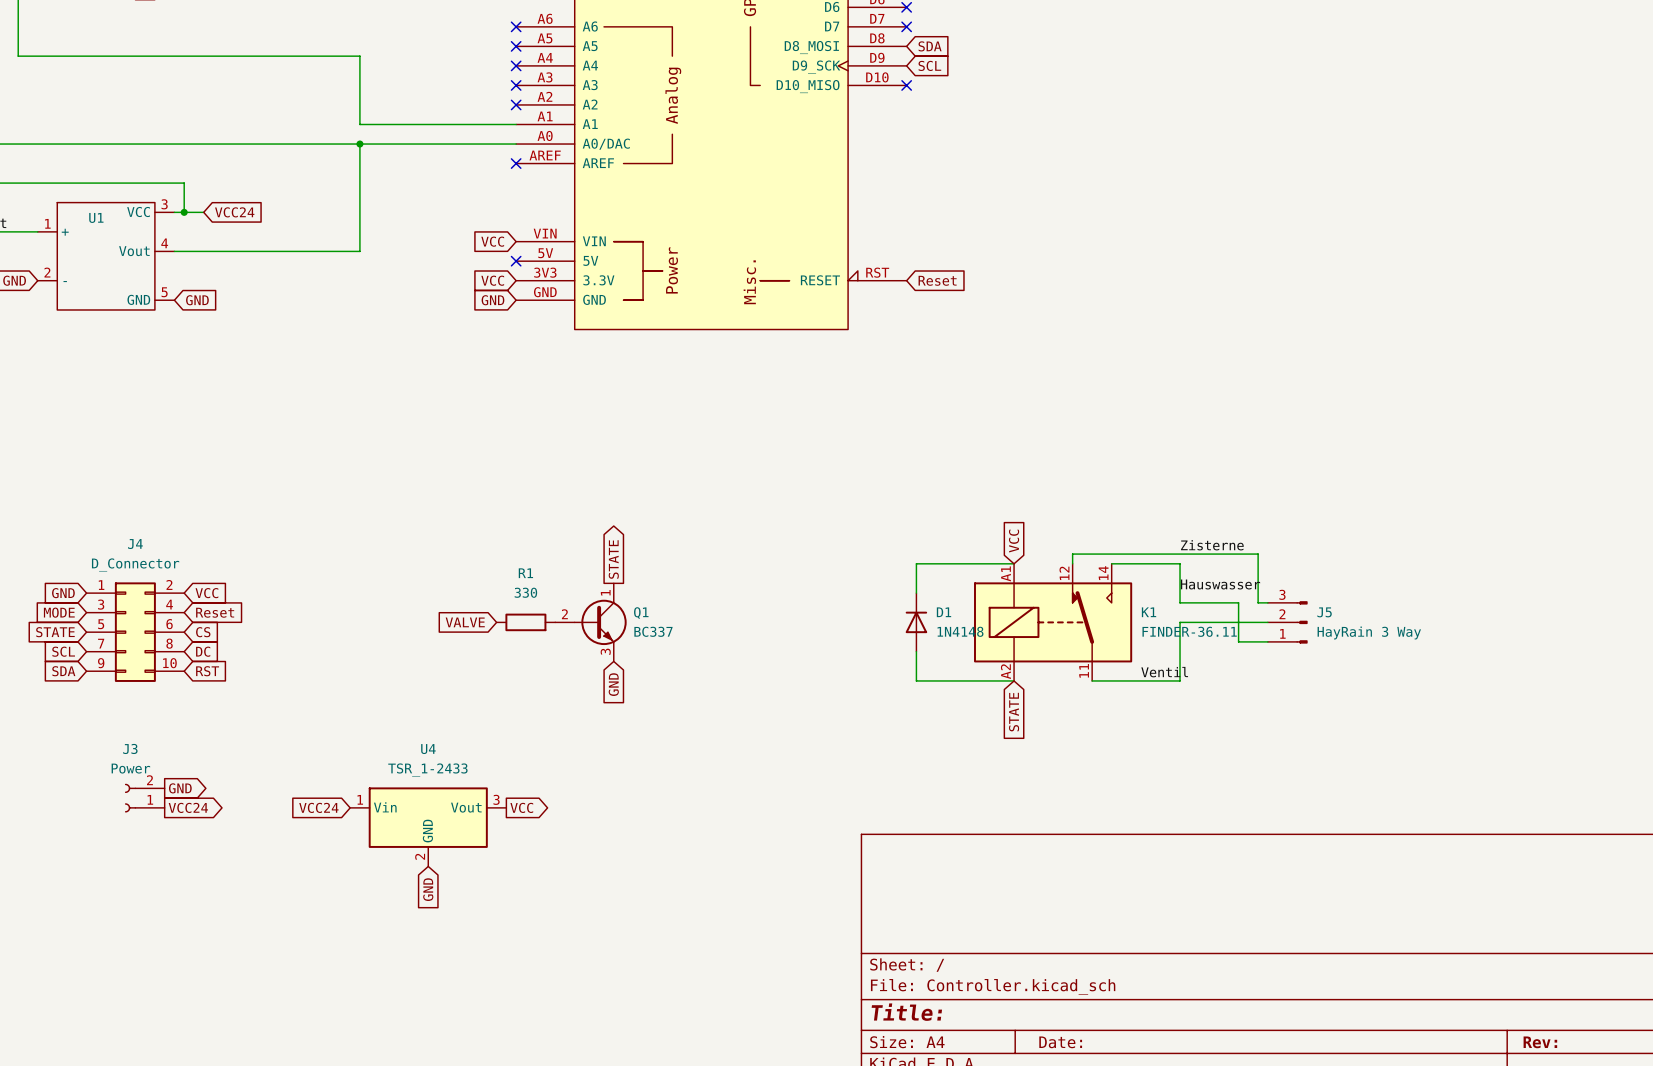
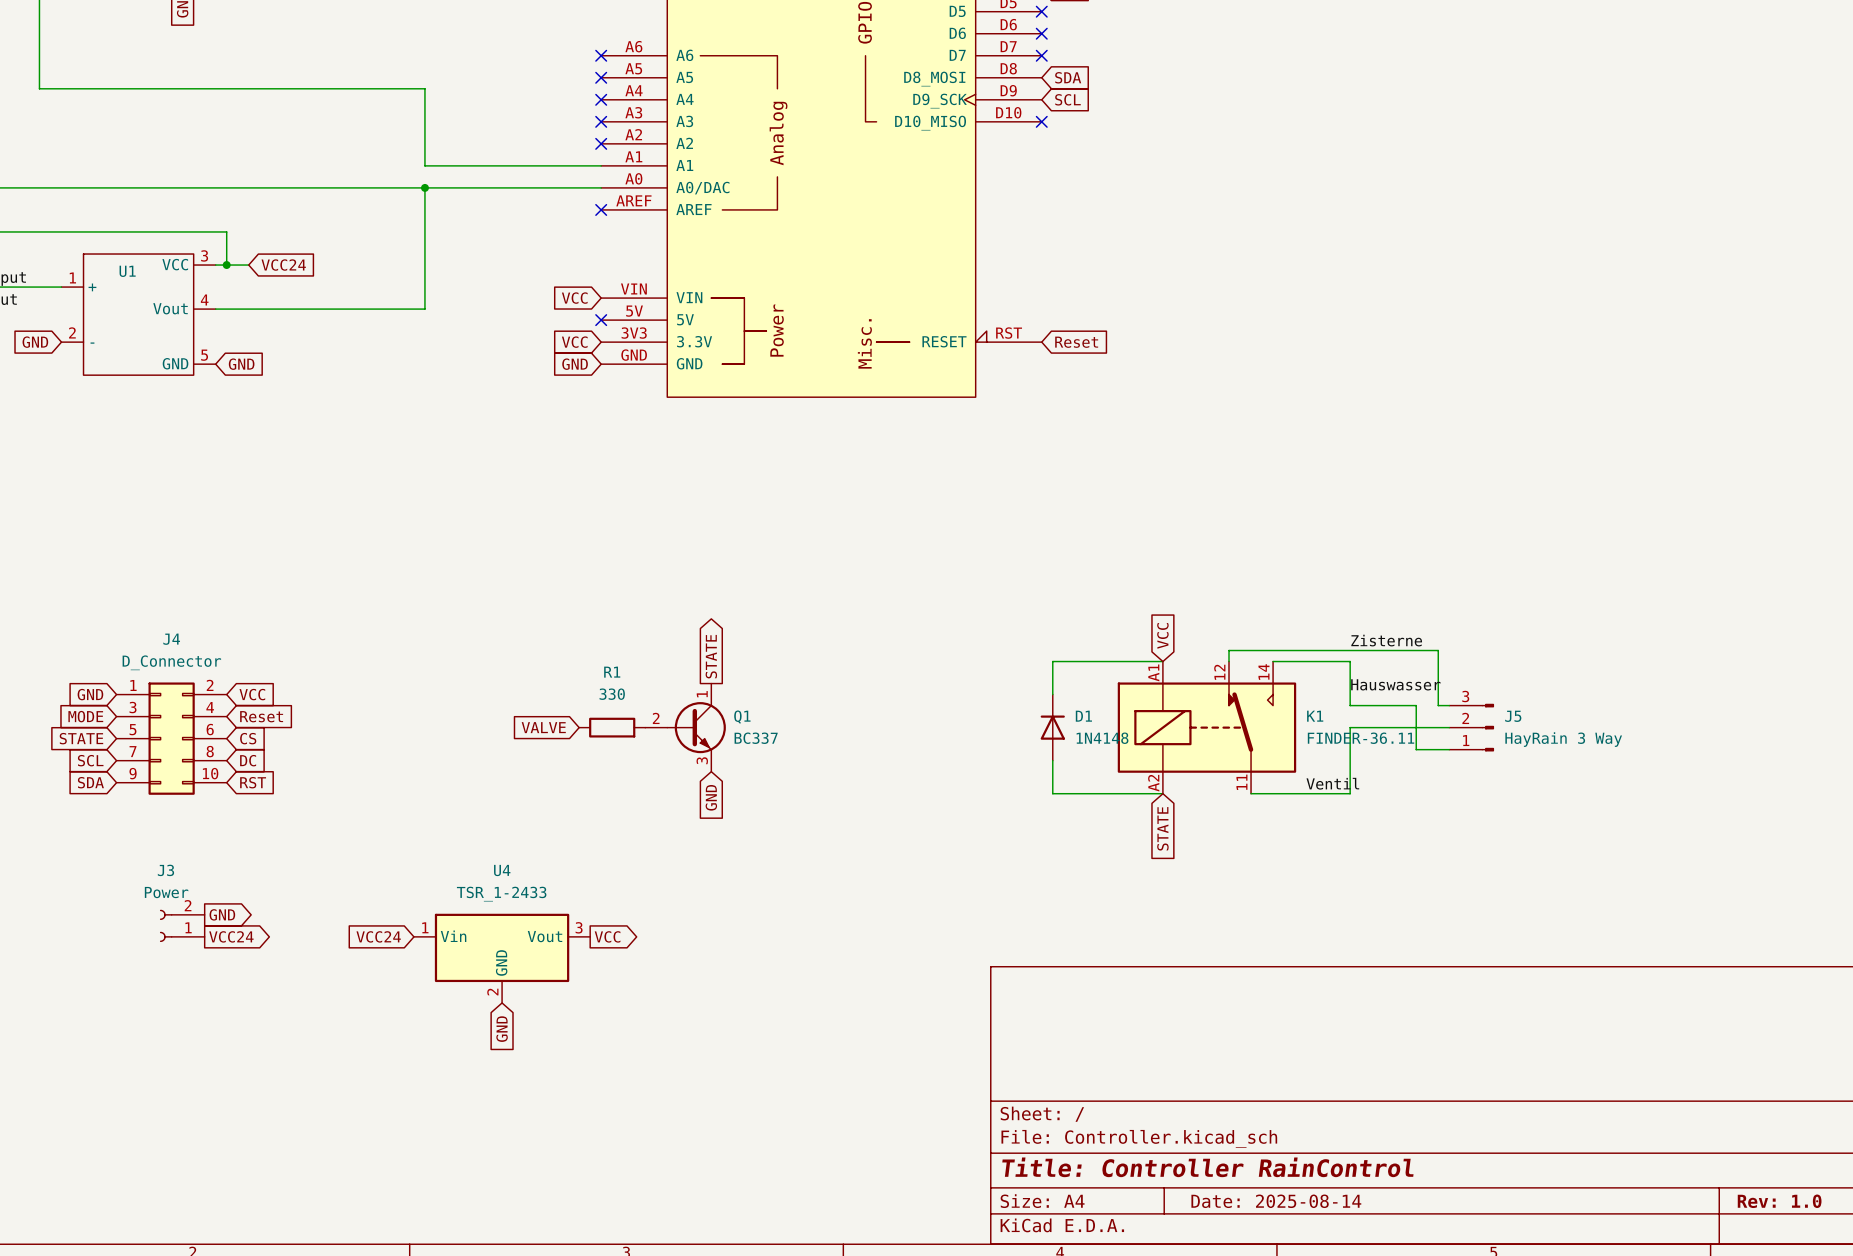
title block: Title: (906, 1012) -> Title: Controller RainControl (1207, 1167)
title block: Date: (1060, 1042) -> Date: 2025-08-14 (1276, 1201)
title block: Rev: (1540, 1042) -> Rev: 1.0 (1779, 1201)

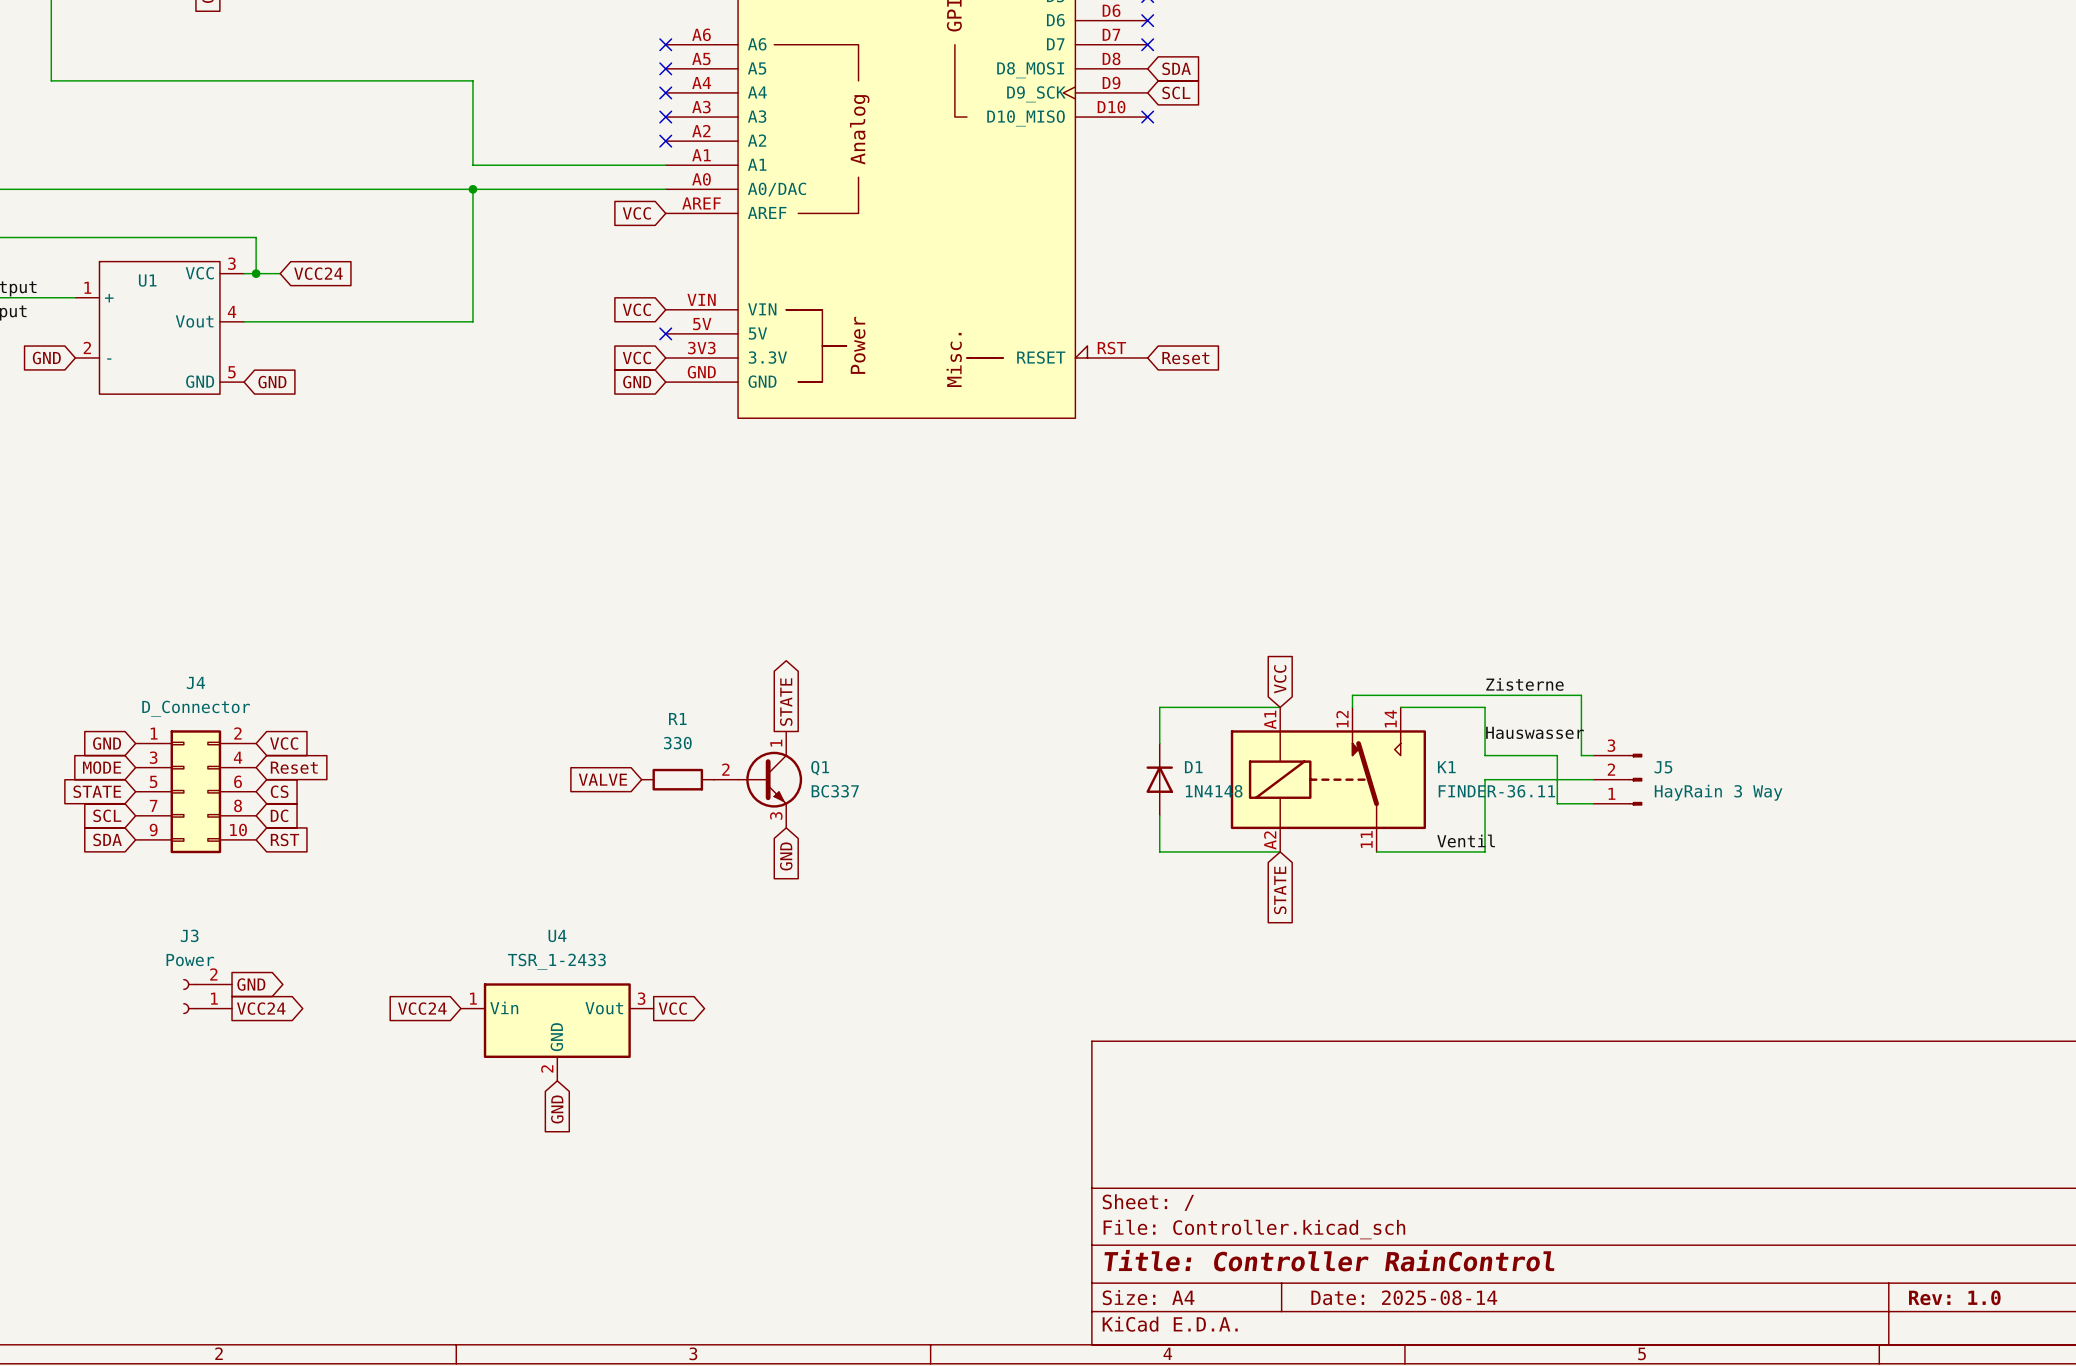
global label: none -> VCC (636, 213)
no-connect mark: (601, 209) -> none

